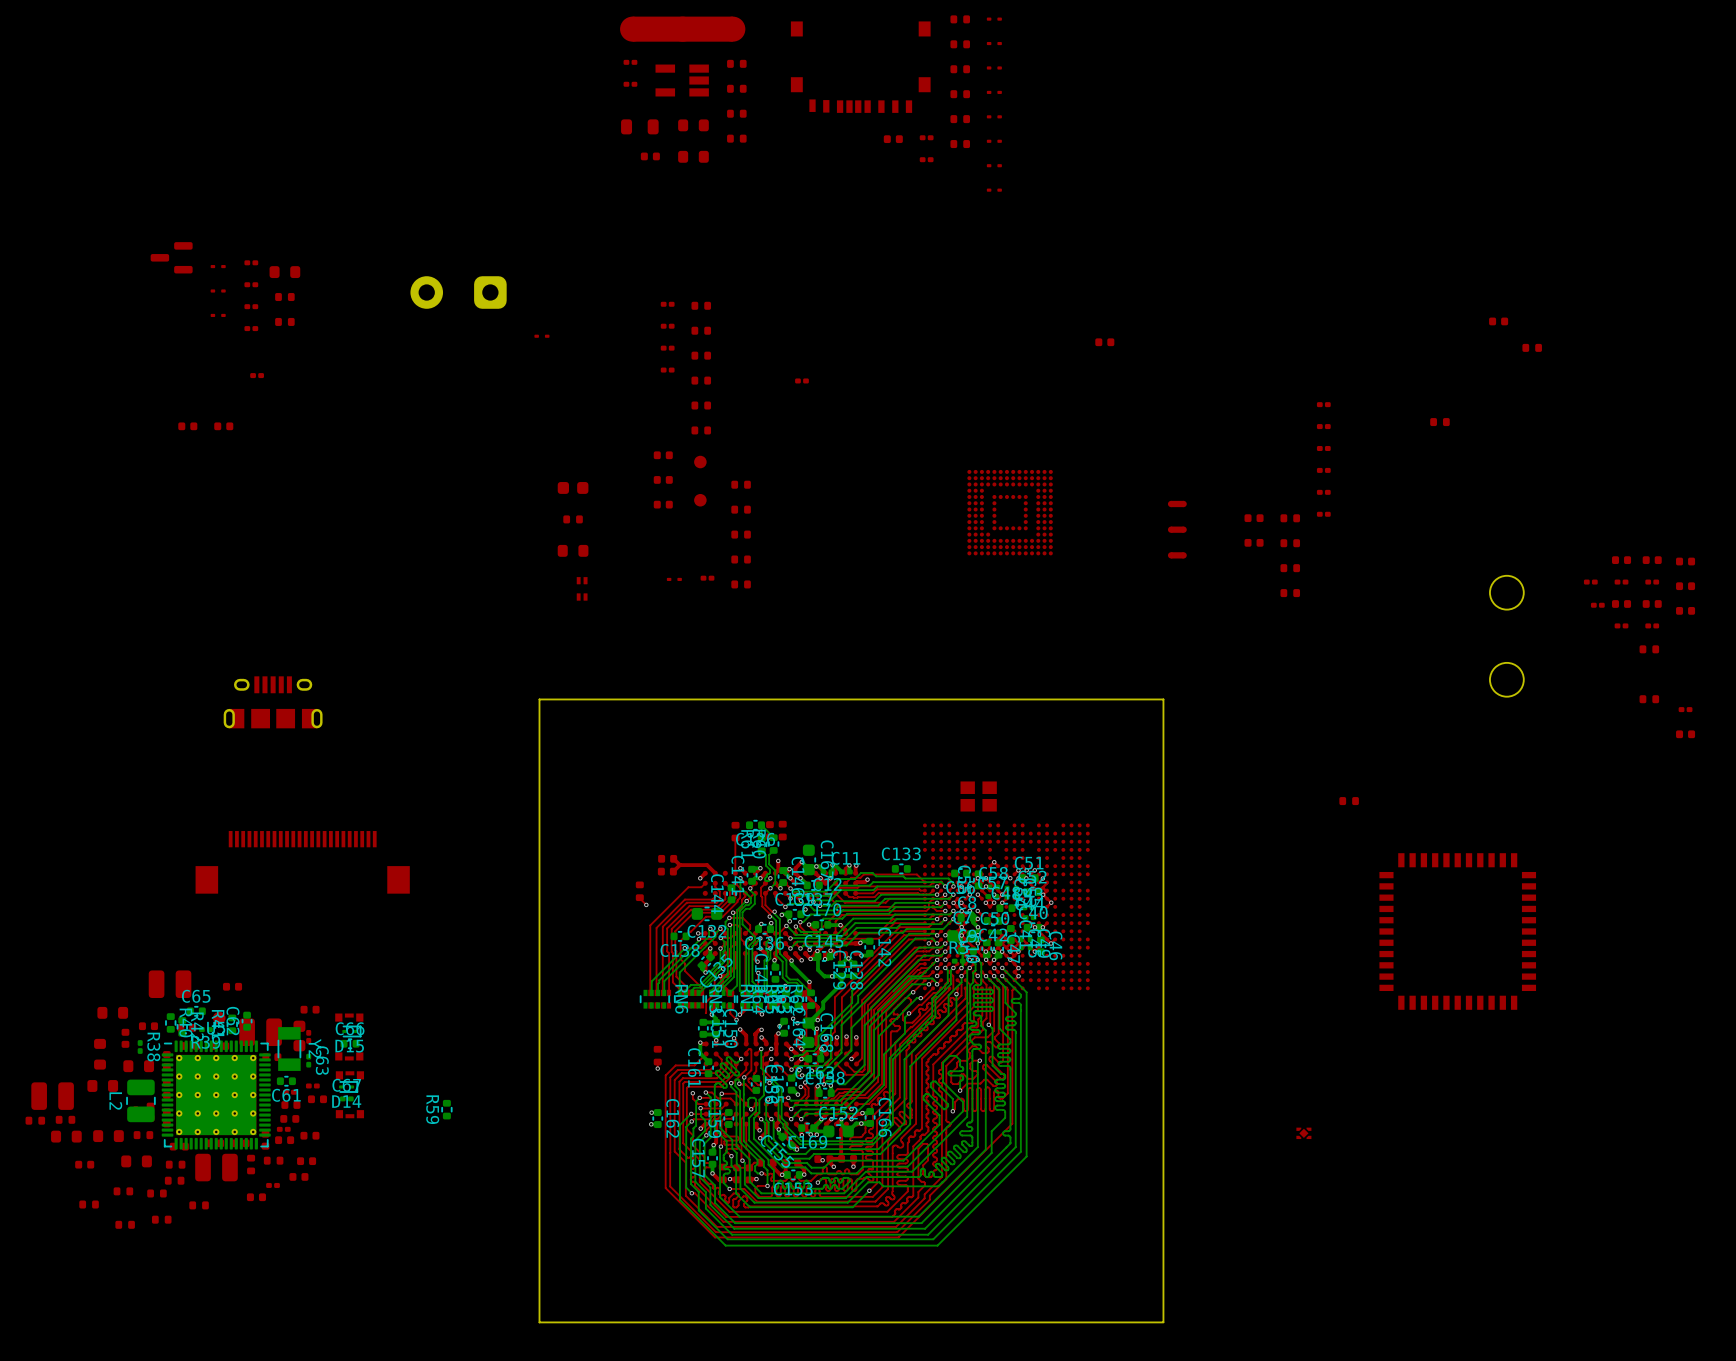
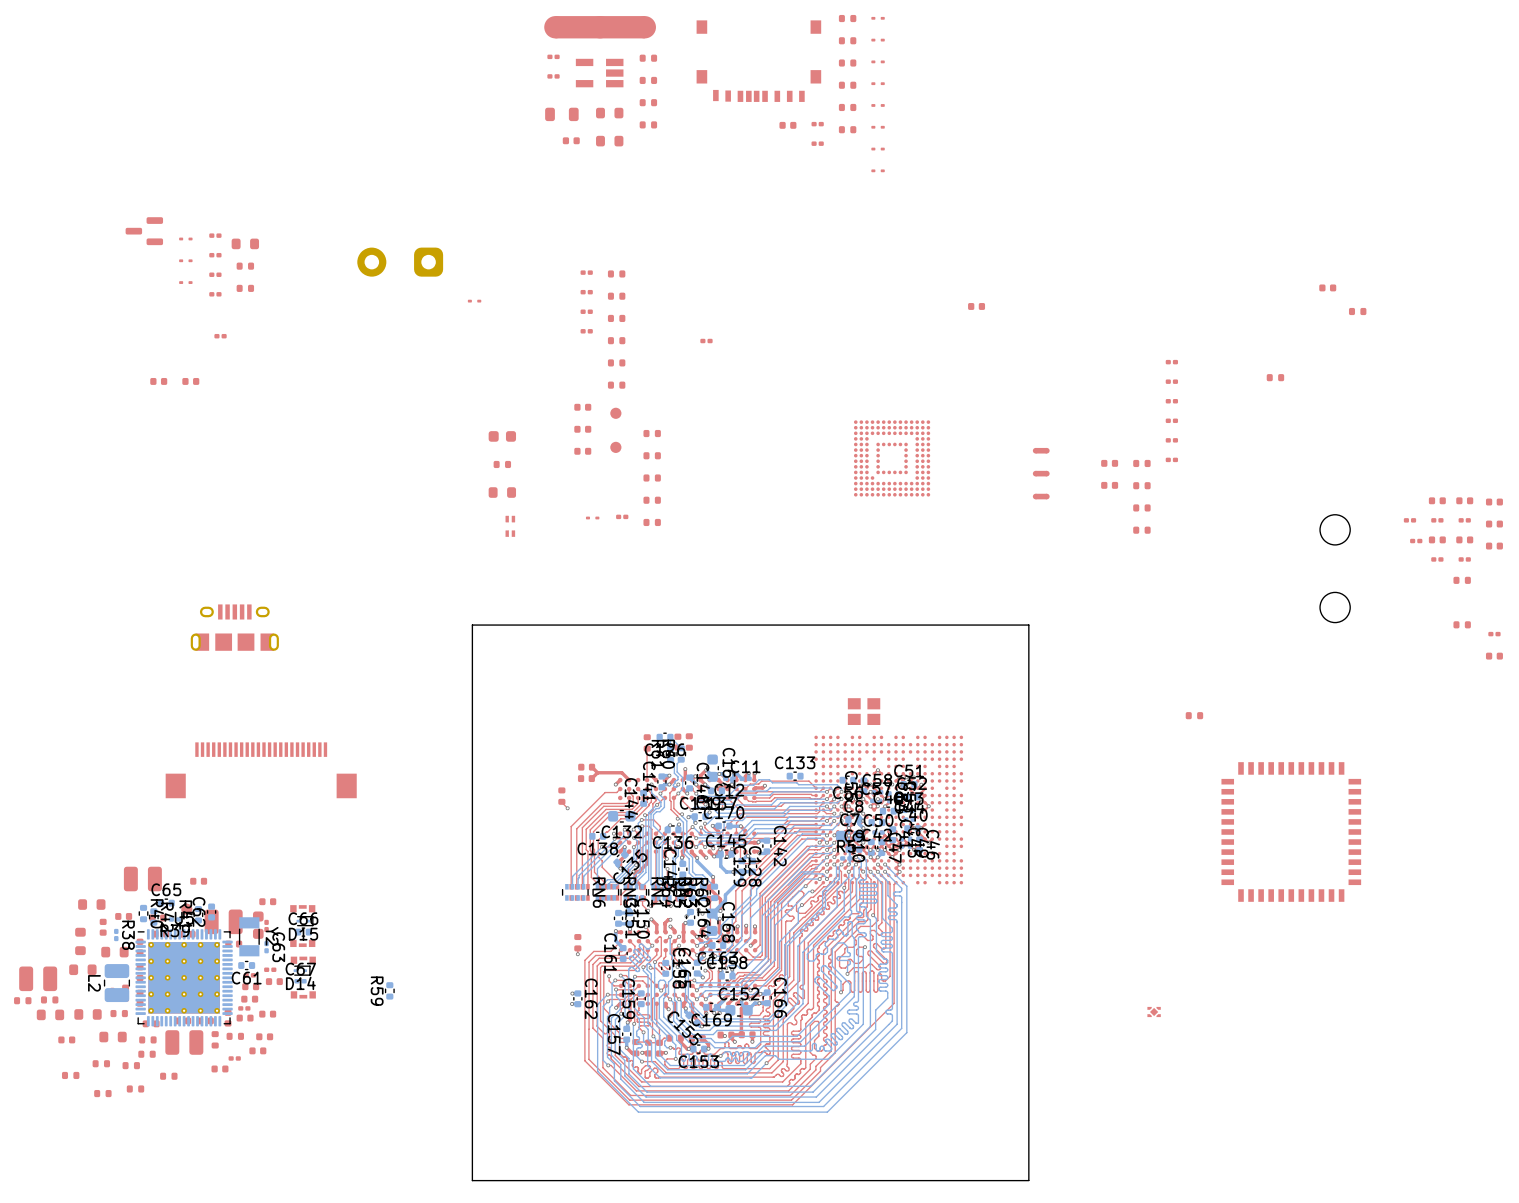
bottom track: (967, 982) (967, 1116) -> (853, 877) (850, 880) (851, 913) (848, 917) (844, 917) (807, 954) (809, 961) (813, 961) (817, 953) (825, 954) (827, 951) (825, 943) (829, 939) (835, 939) (837, 937) (836, 931) (837, 929) (846, 935) (847, 922) (851, 921) (852, 935) (854, 938) (853, 997)

